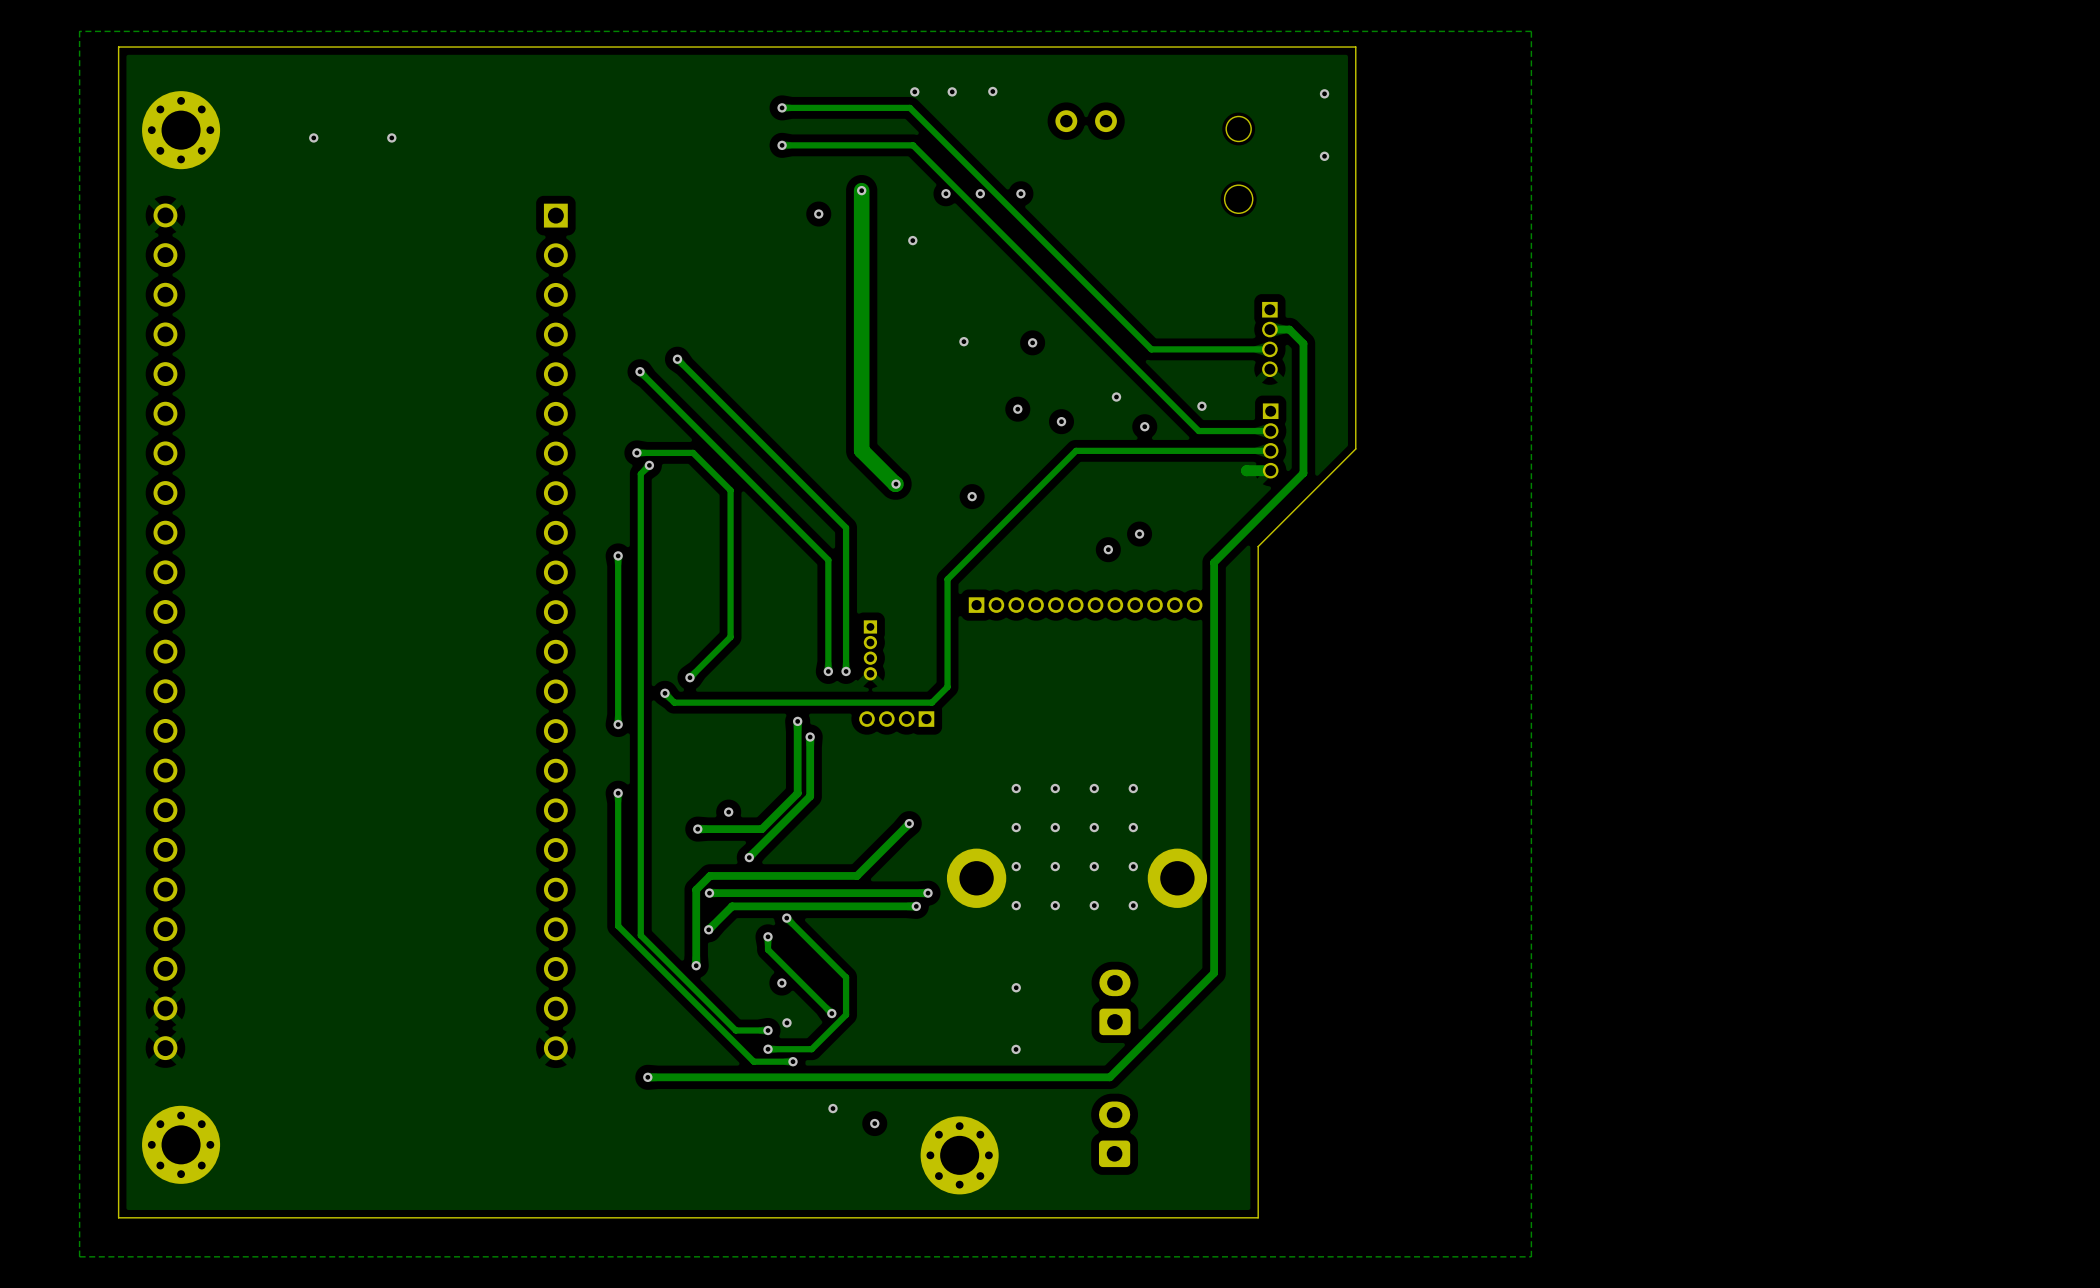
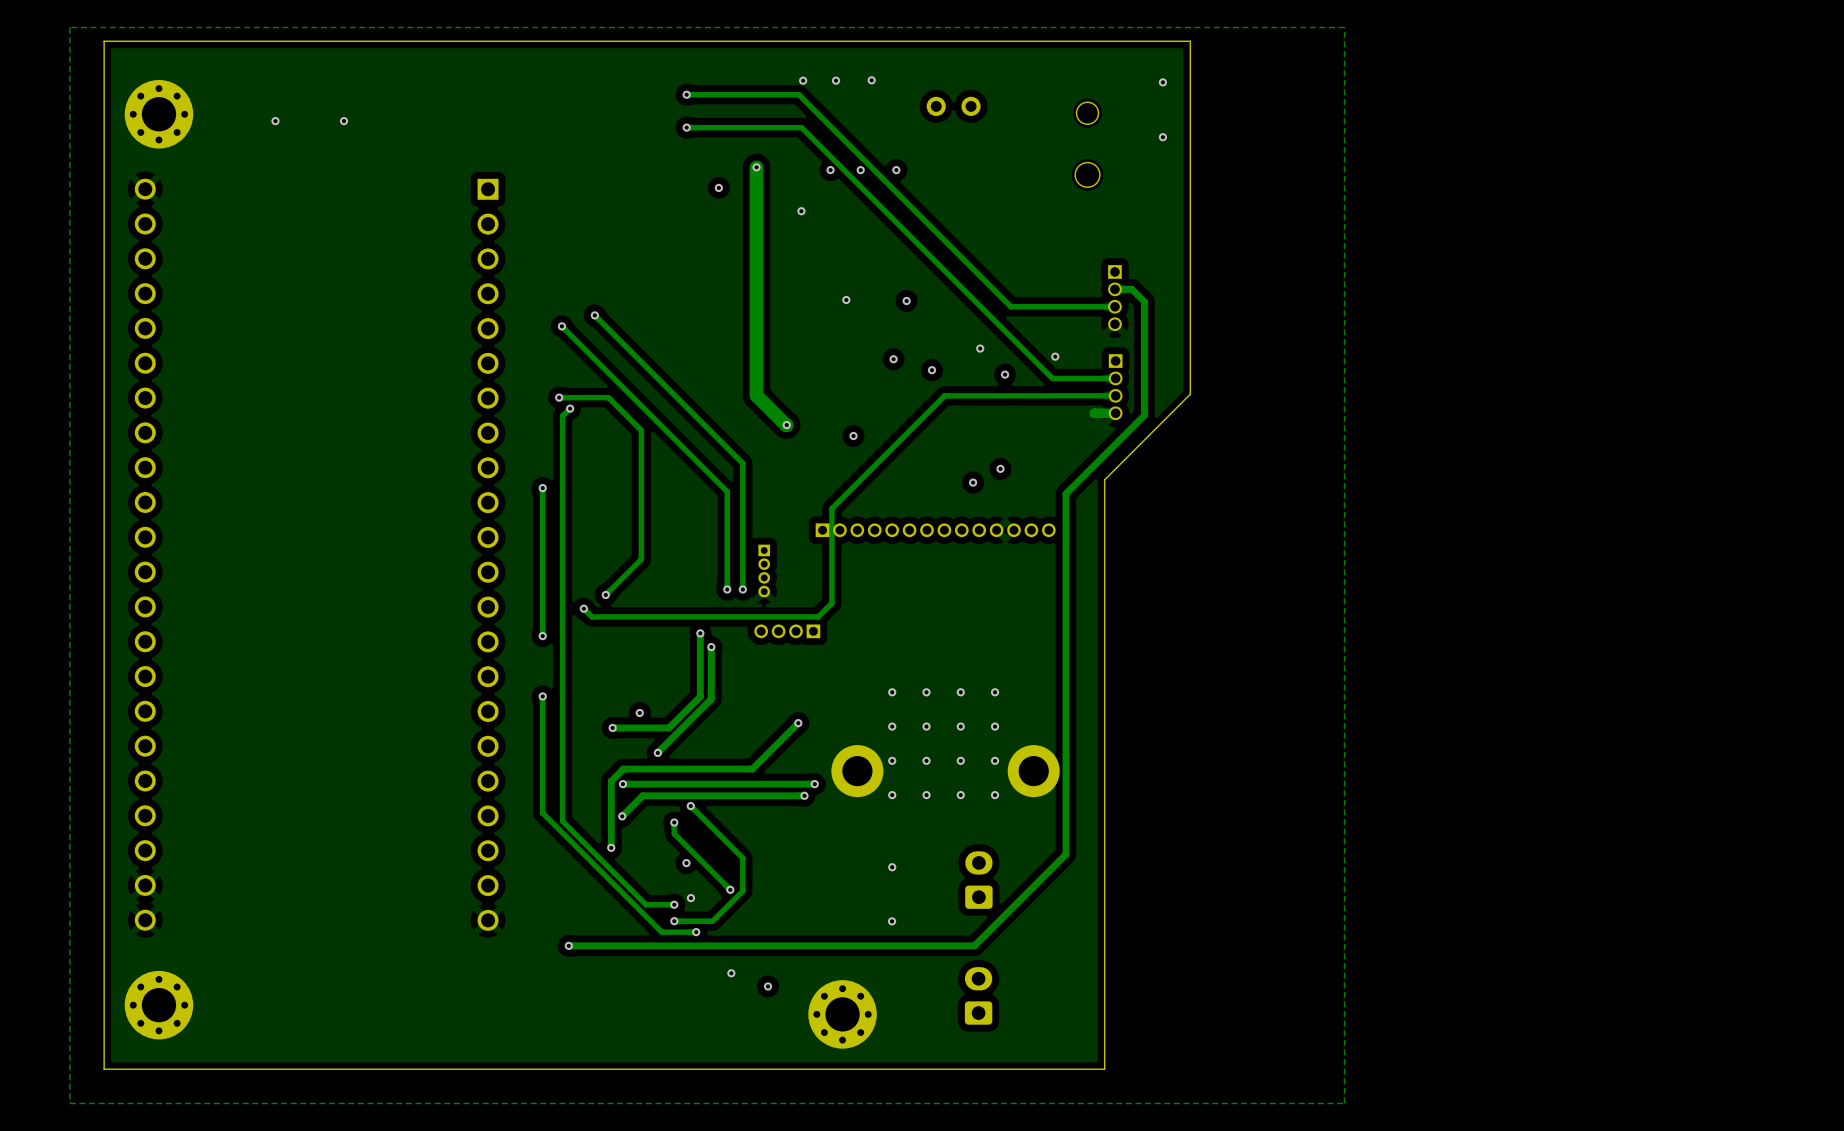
part: none -> (935, 530)
part: (1085, 605) -> none

